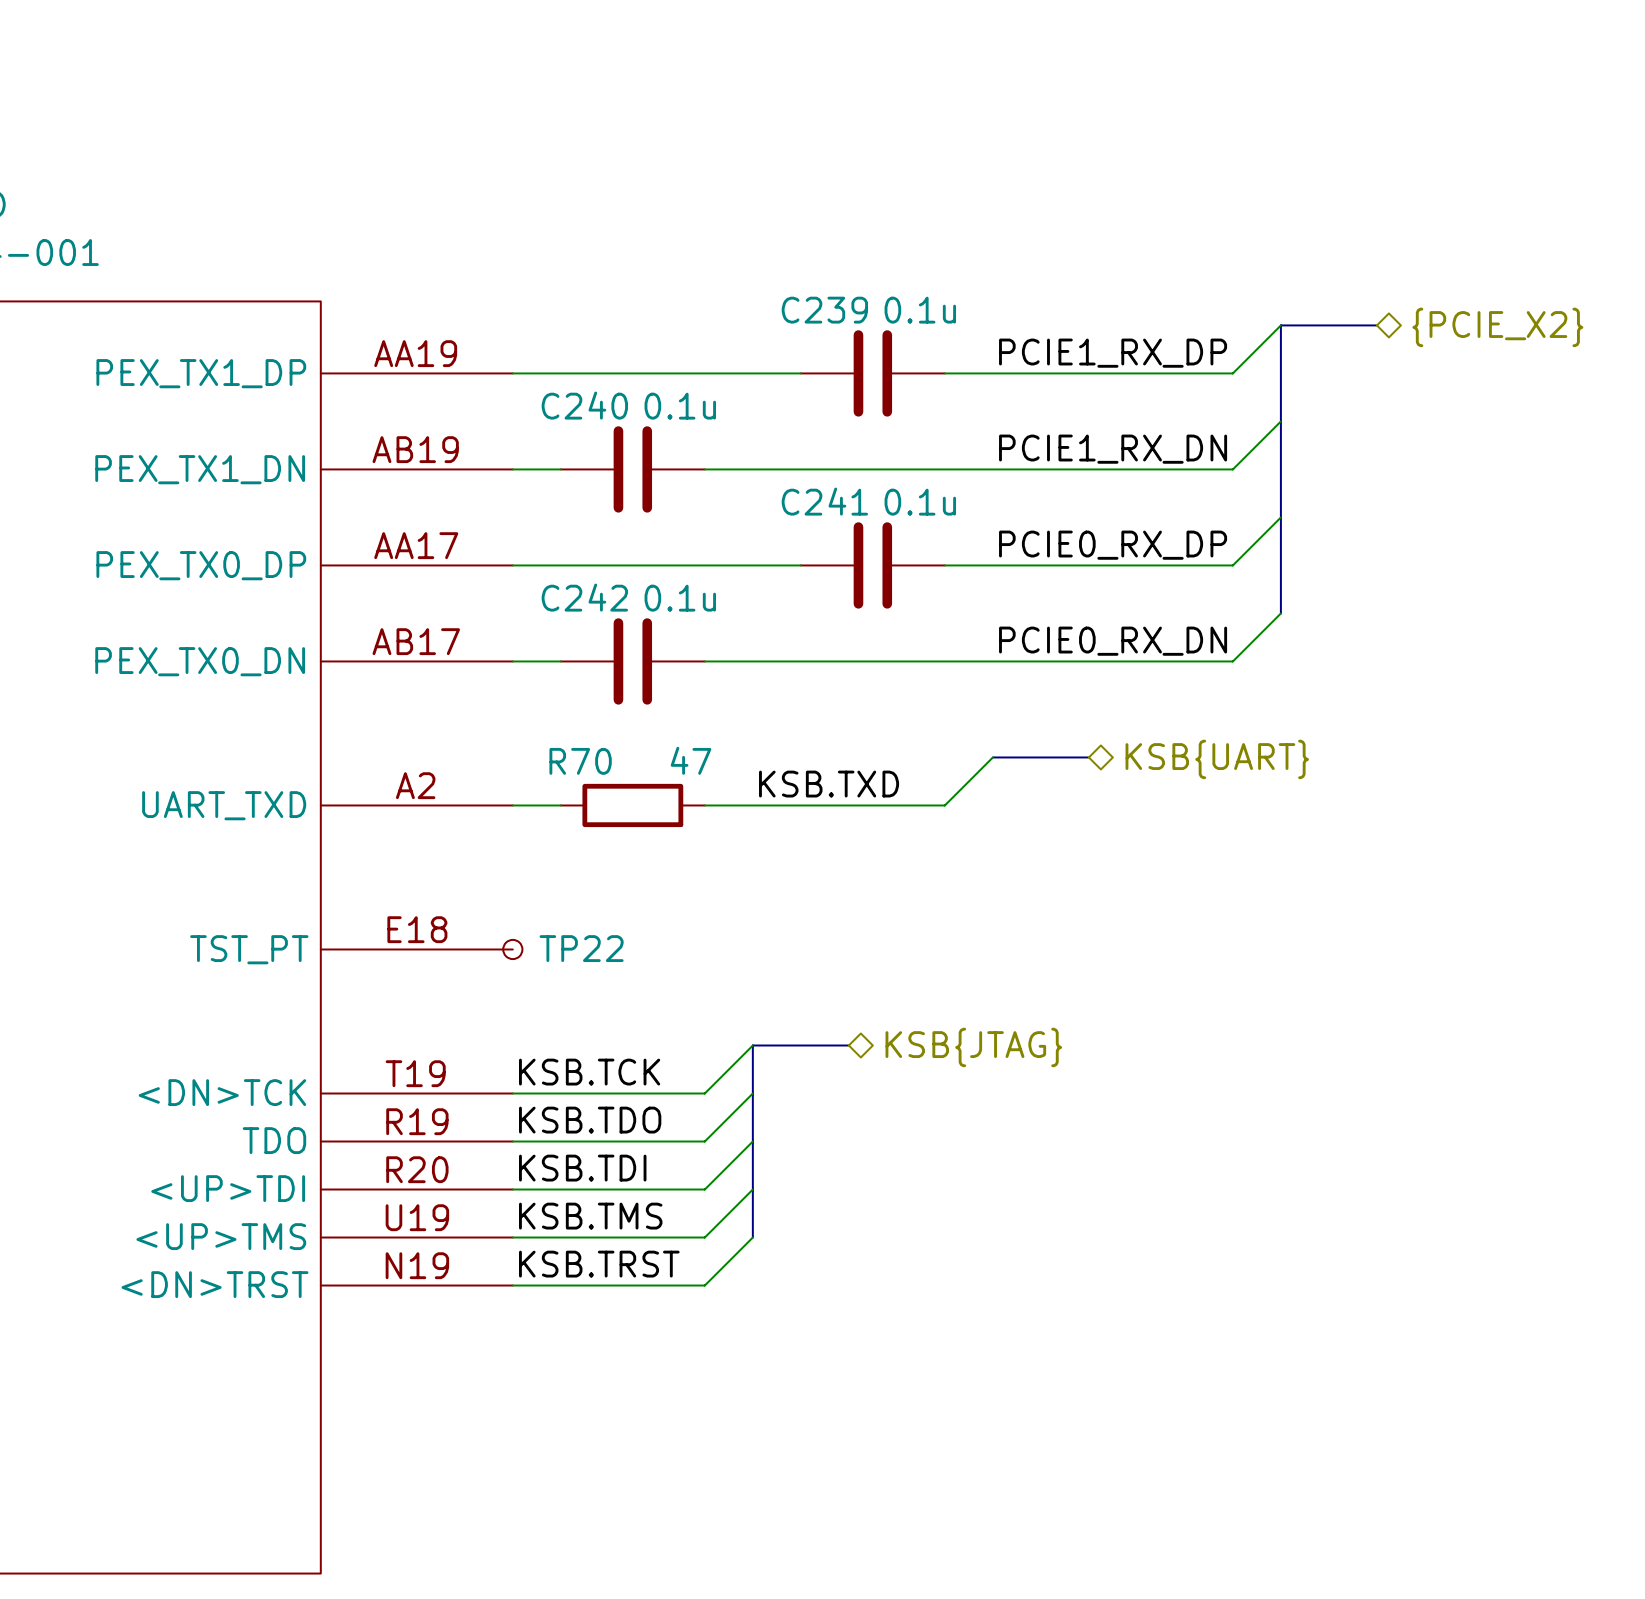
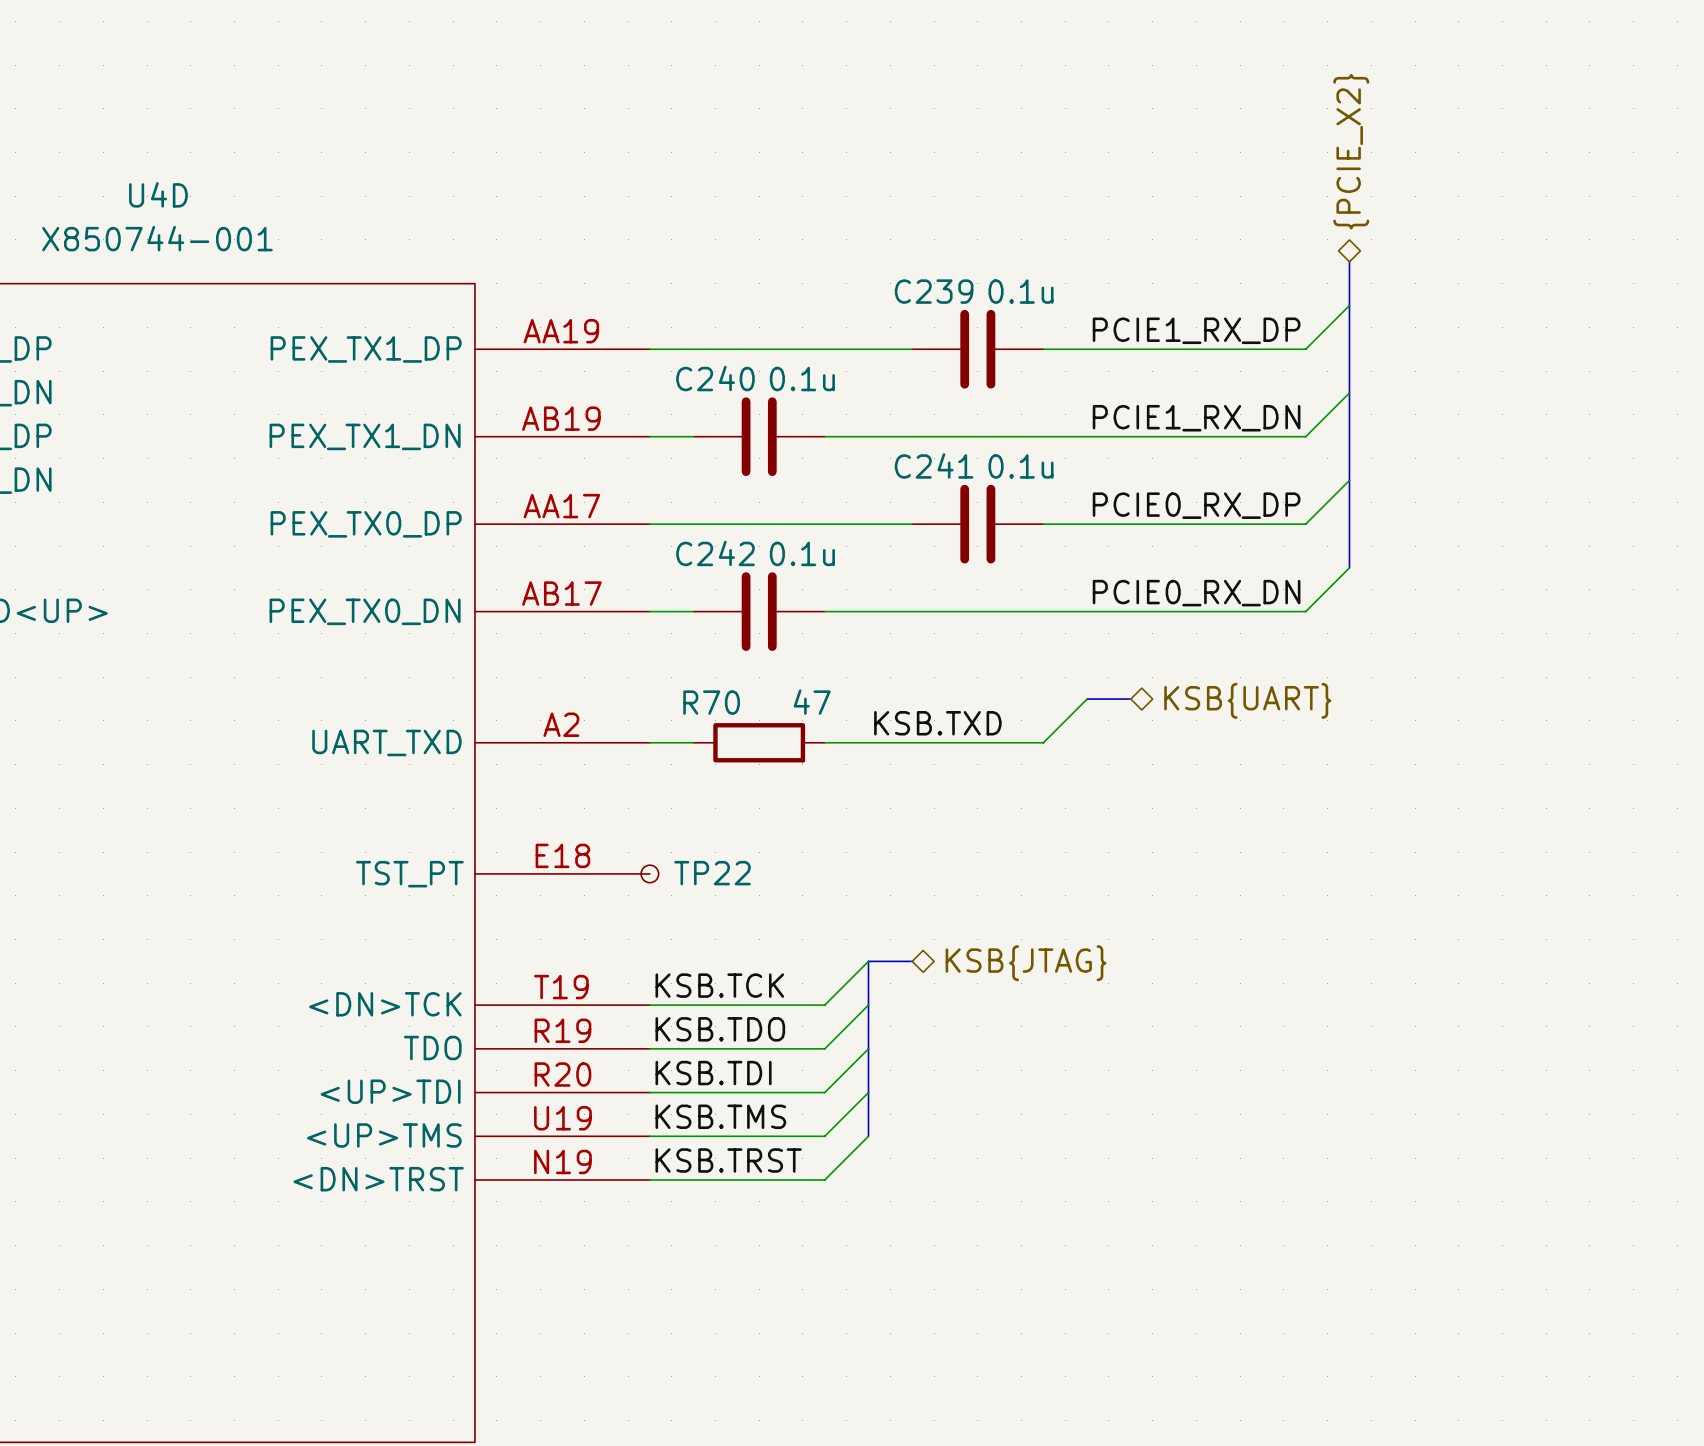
bus: (1280, 325) (1376, 325) -> (1349, 305) (1349, 261)
hierarchical label rotation: 0° (1497, 327) -> 90° counterclockwise (1351, 151)
hierarchical label position: {PCIE_X2} (1497, 327) -> {PCIE_X2} (1351, 151)
bus: (1040, 757) (1088, 757) -> none
hierarchical label position: KSB{UART} (1217, 759) -> KSB{UART} (1247, 700)
bus: (800, 1045) (848, 1045) -> none
hierarchical label position: KSB{JTAG} (973, 1047) -> KSB{JTAG} (1026, 963)

